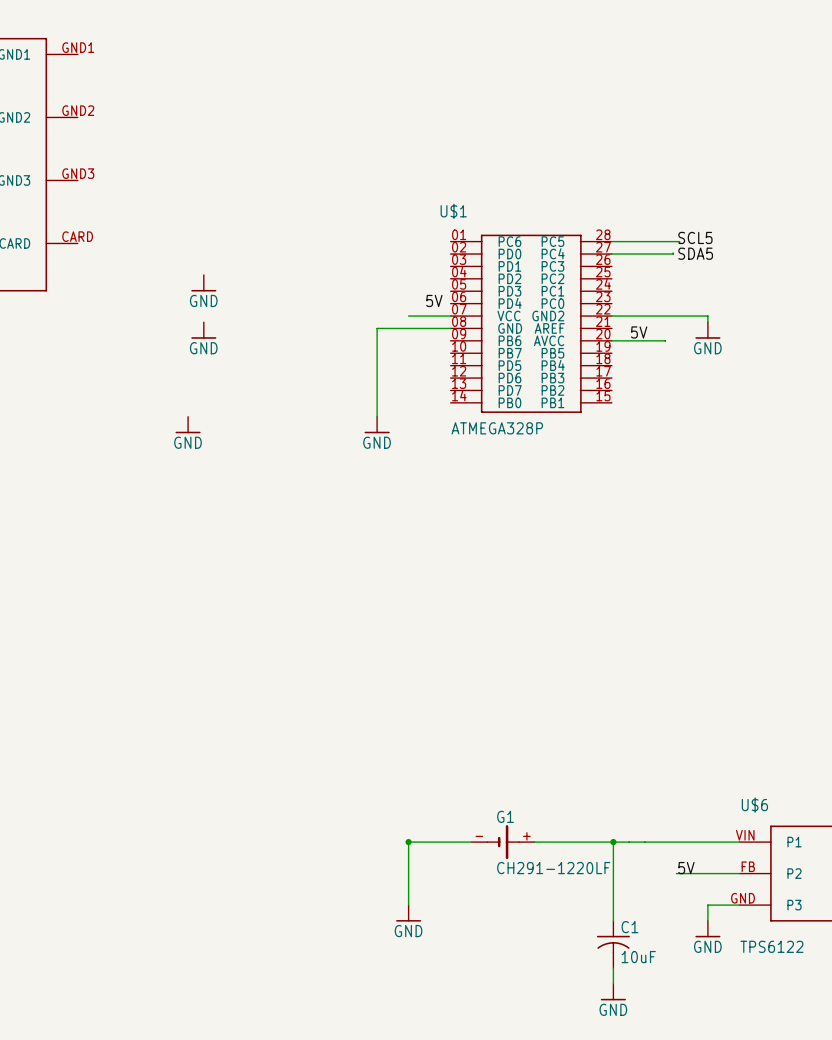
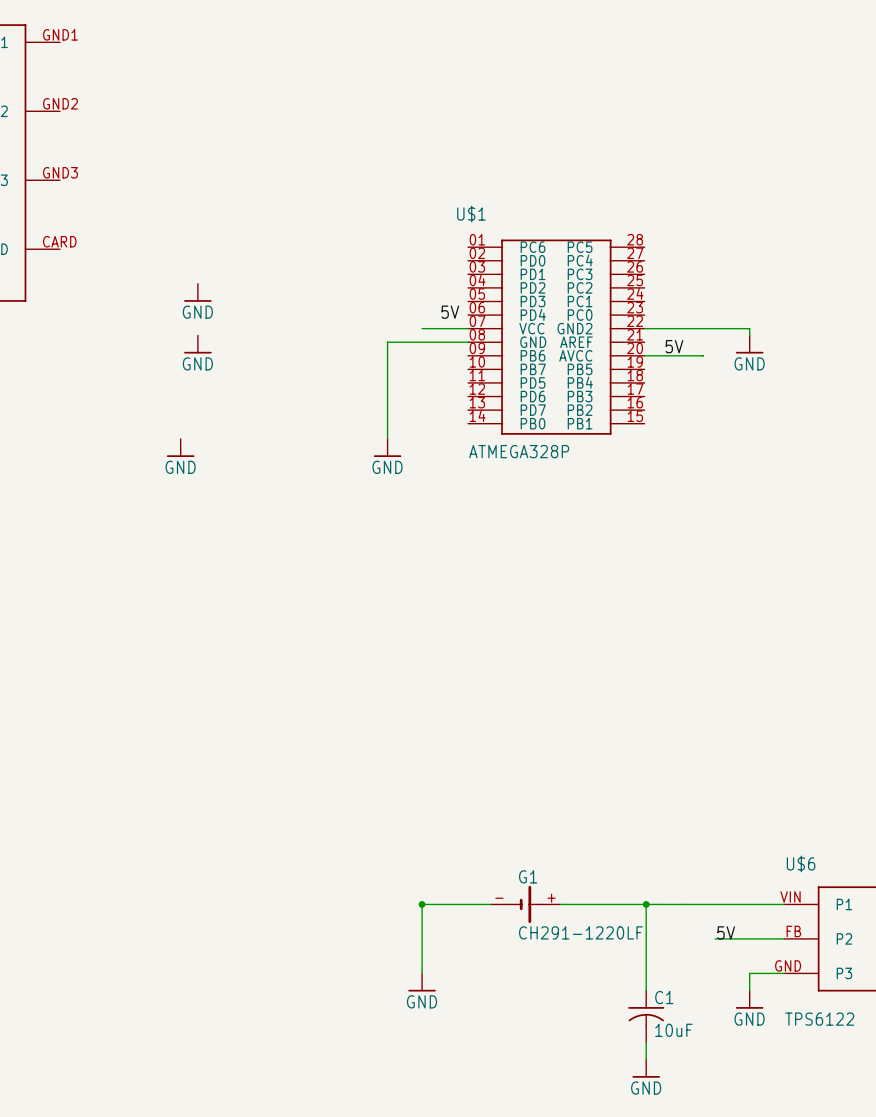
label: SCL5 (695, 237) -> none
wire: (611, 241) (679, 241) (679, 243) -> none
wire: (673, 252) (611, 254) -> none
label: SDA5 (695, 253) -> none

